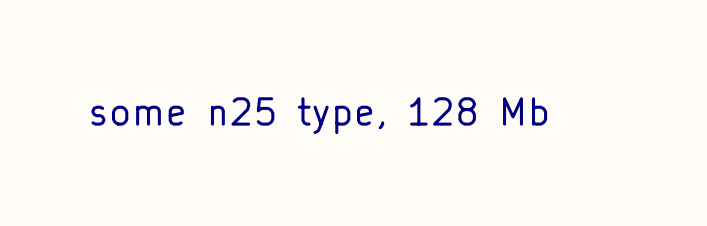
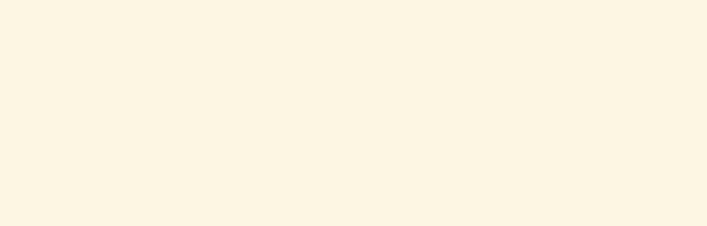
text: some n25 type, 128 Mb (319, 115) -> none

